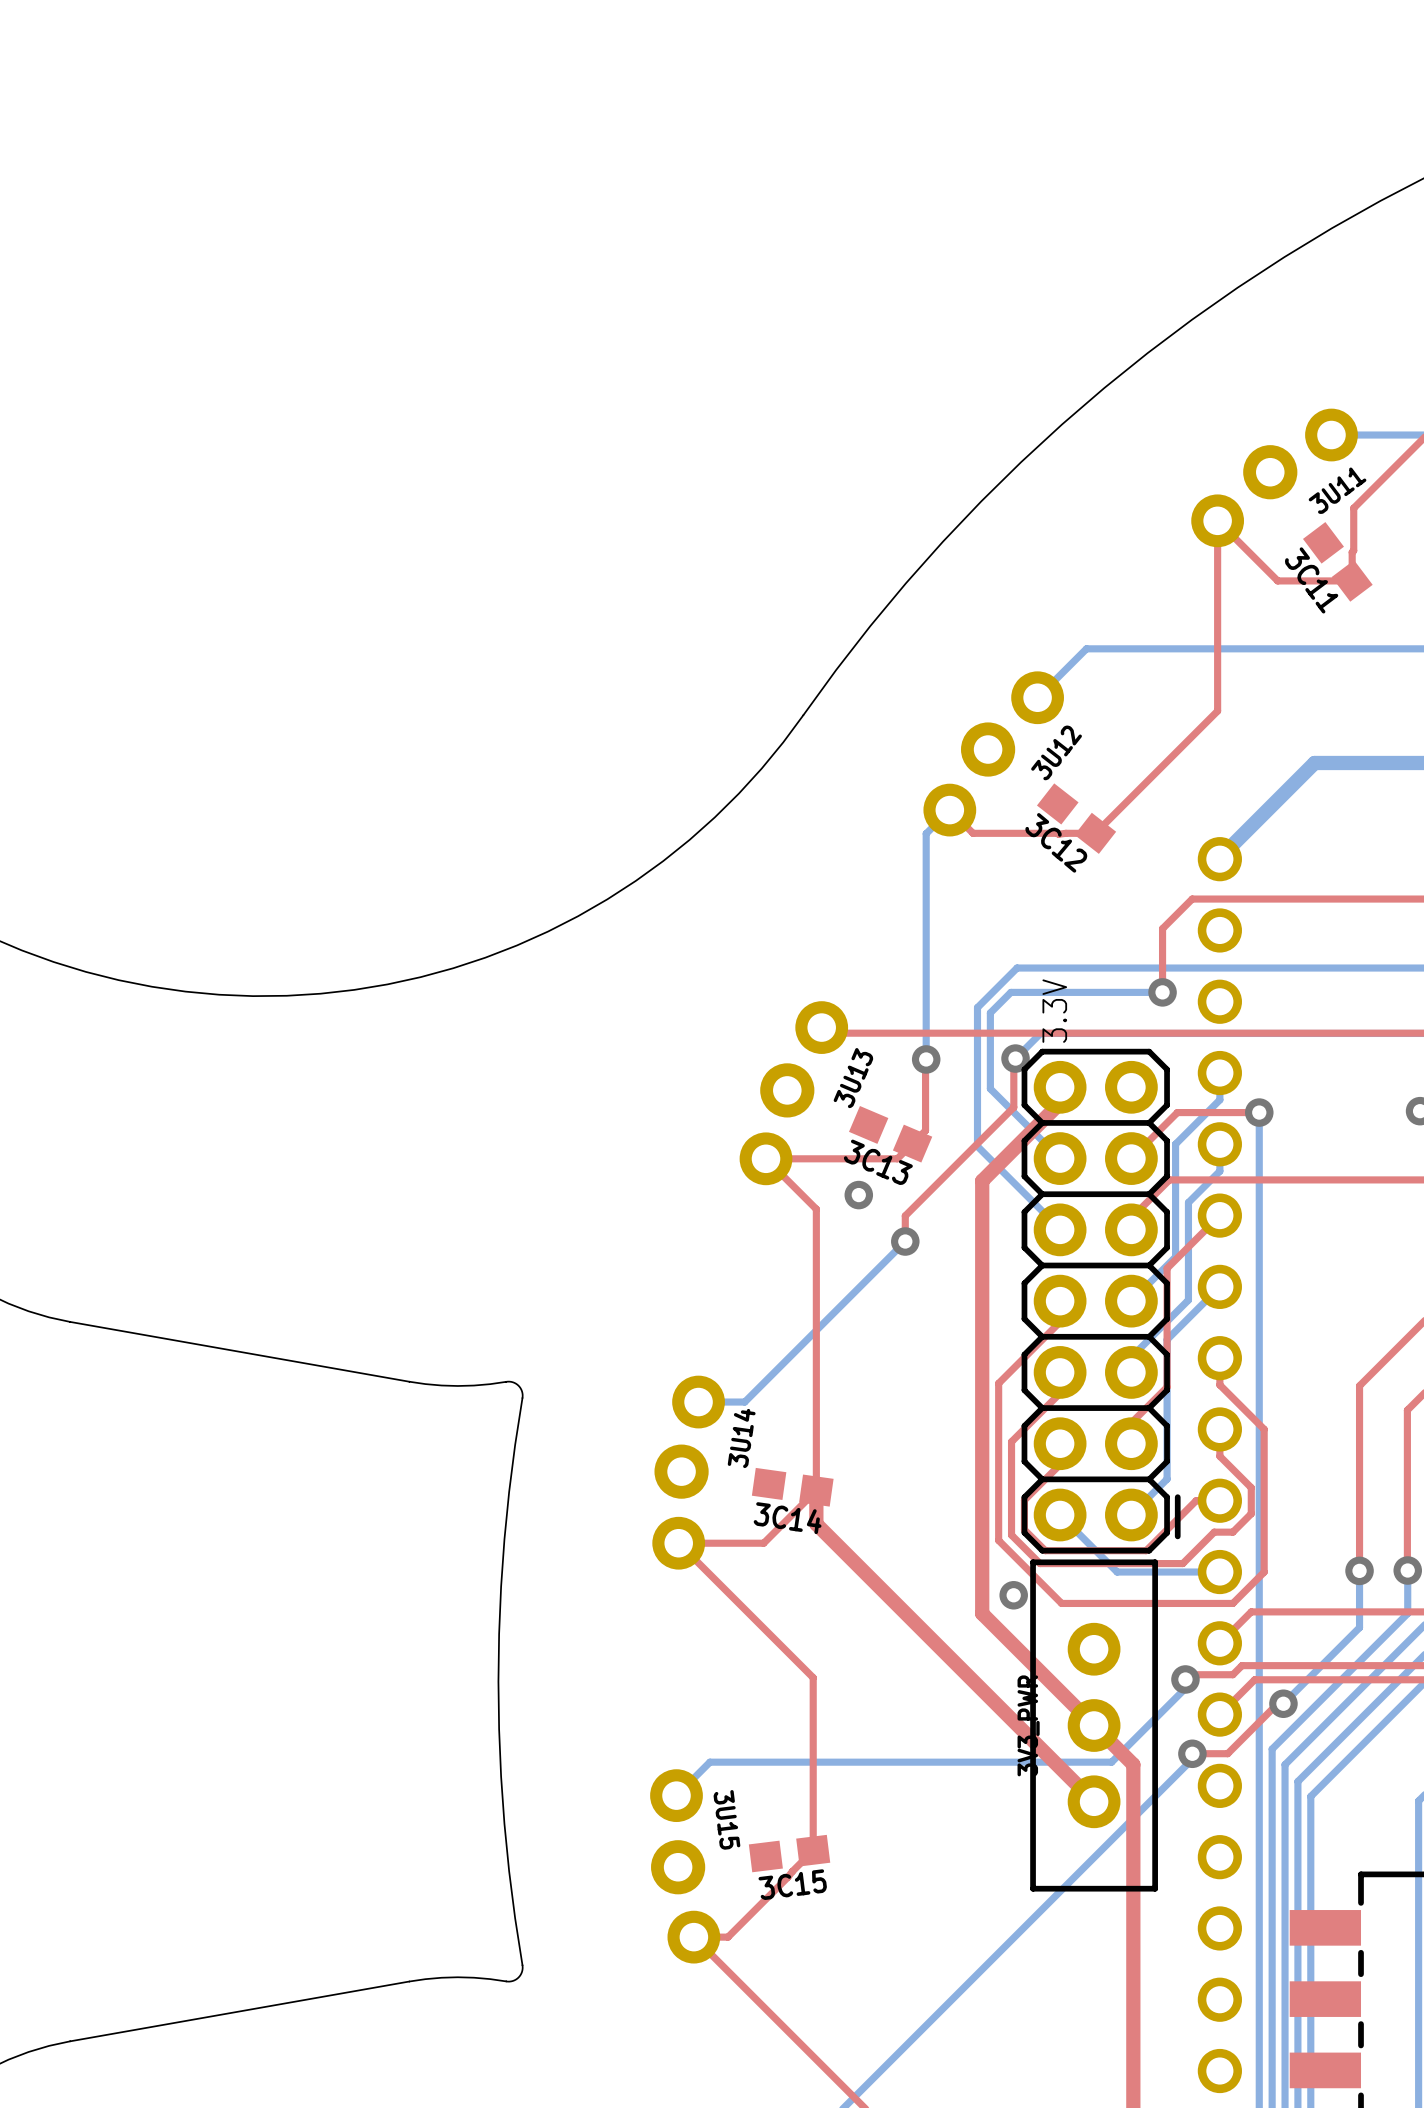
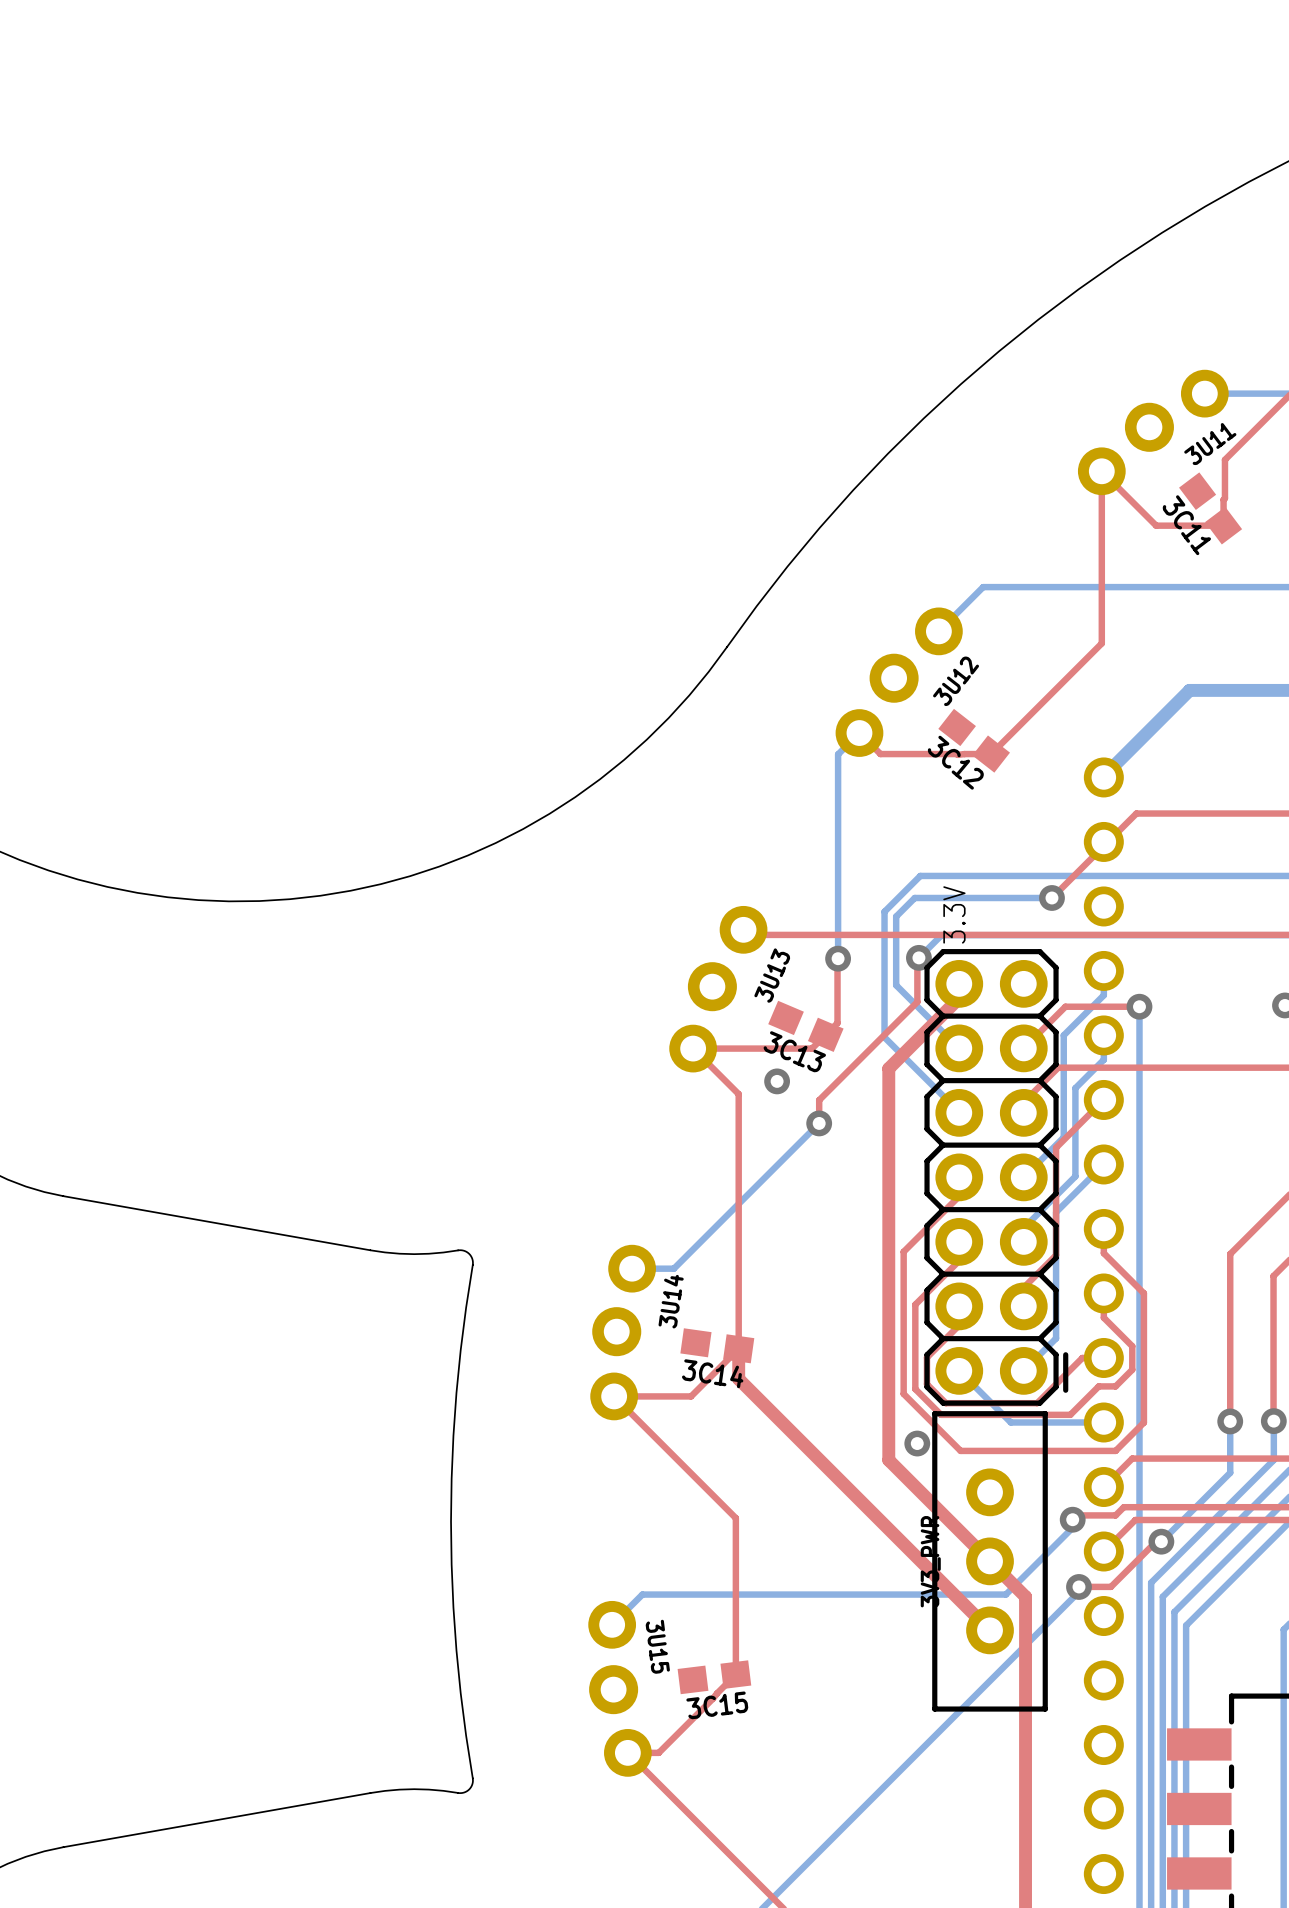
top track: (1255, 899) (1192, 899) (1162, 928) (1162, 992) -> (1136, 813) (1051, 897)

